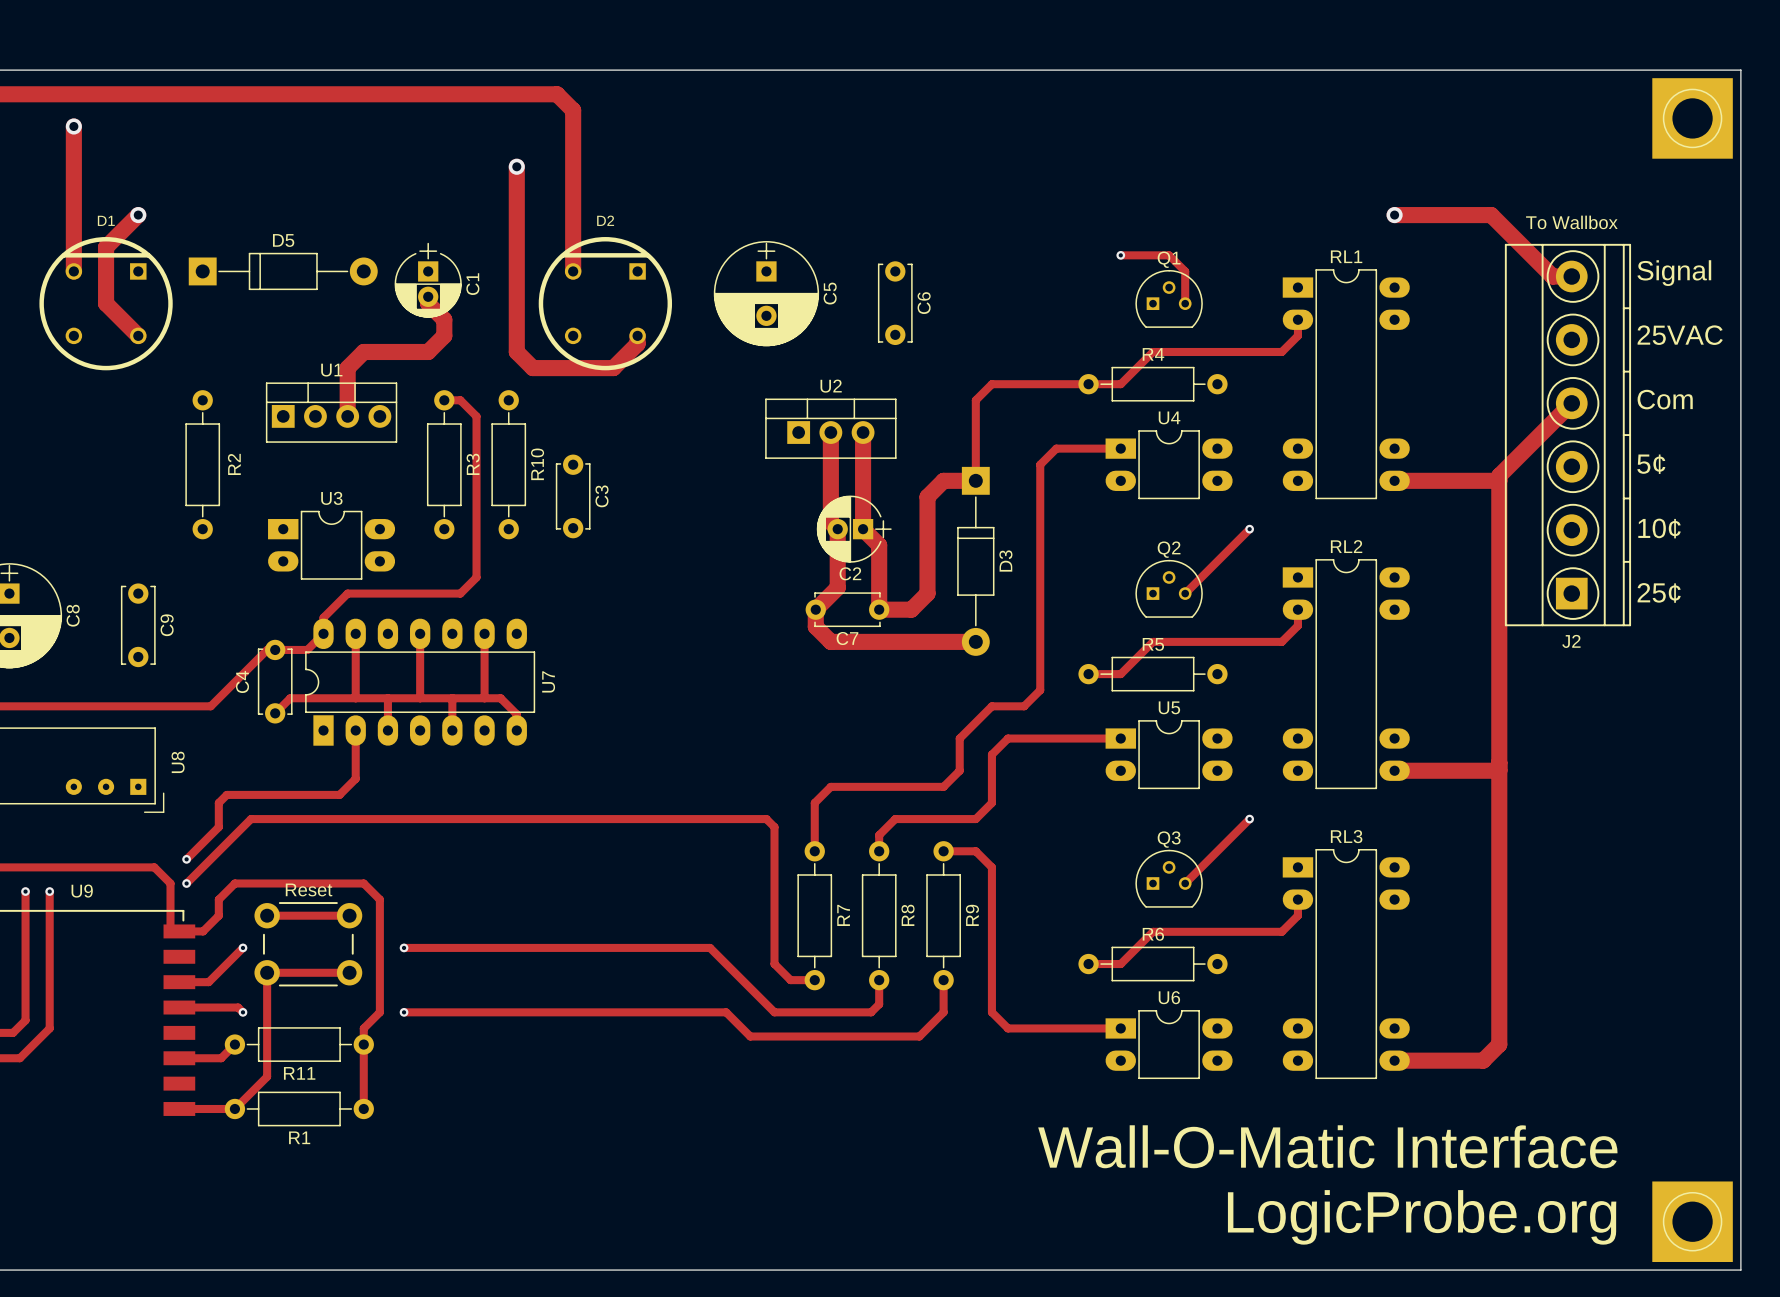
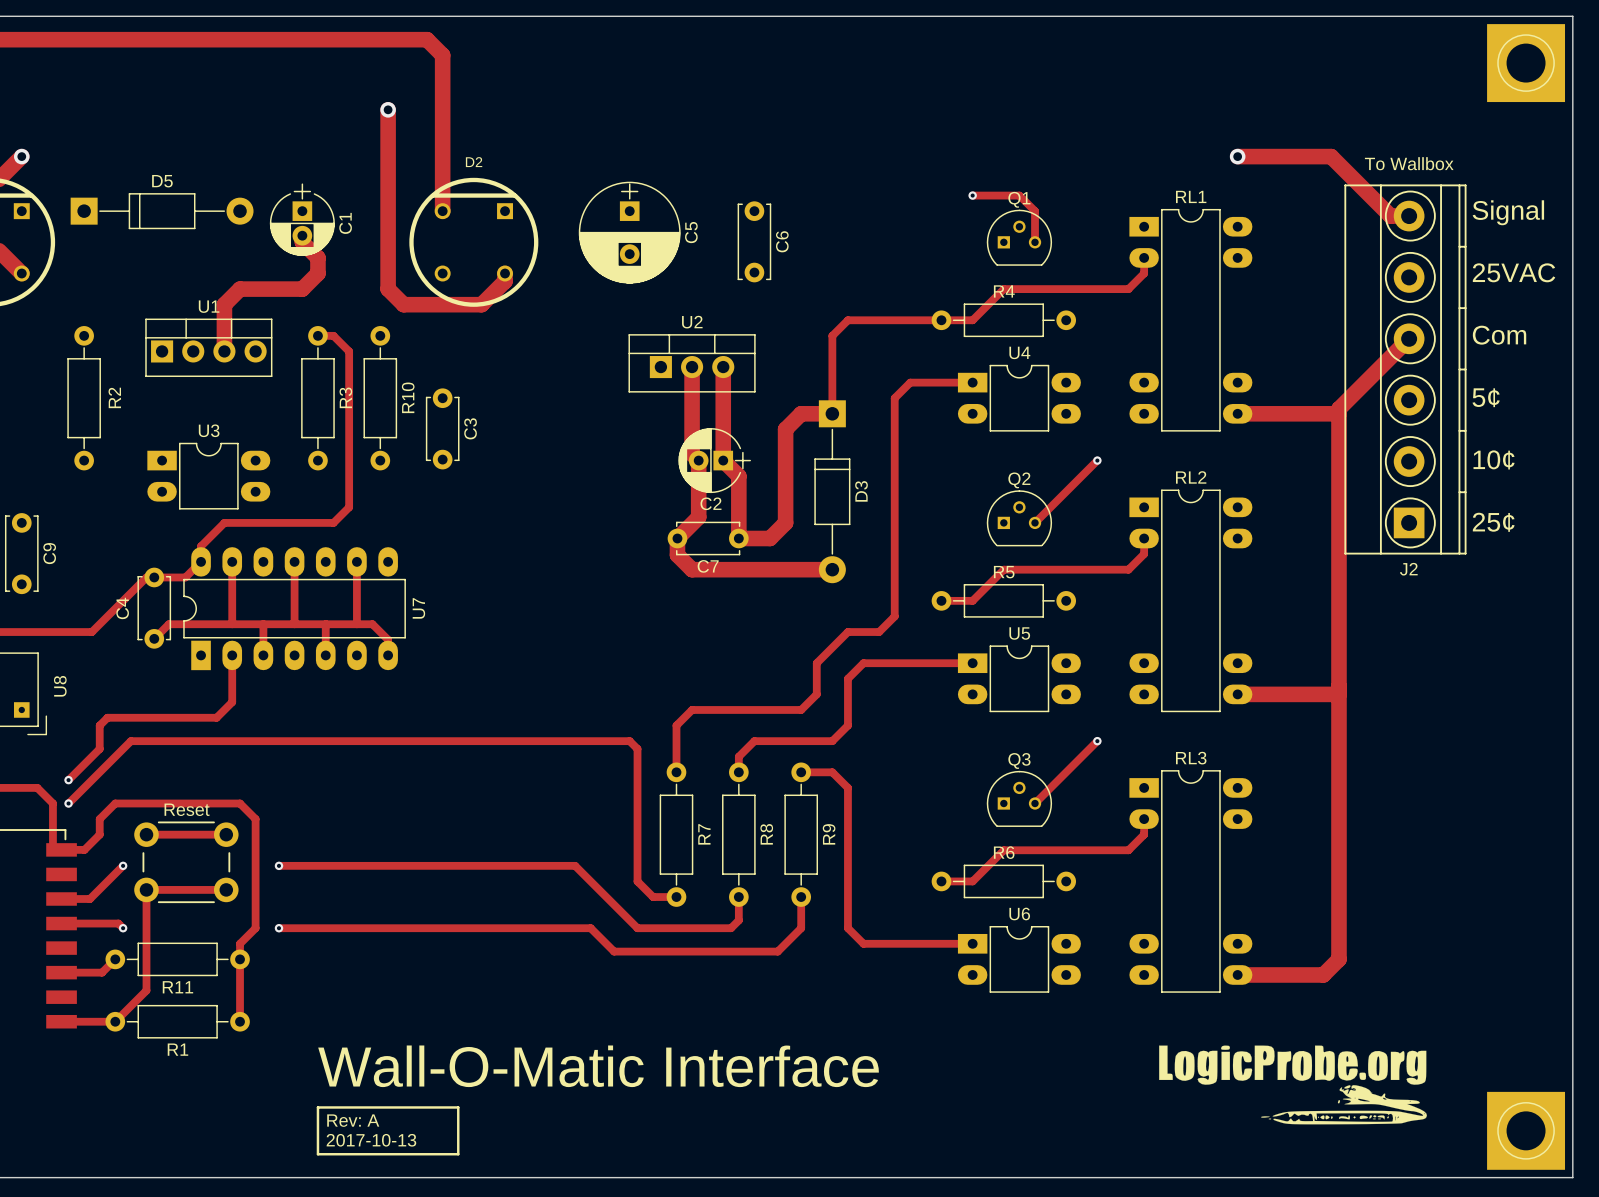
drawing: none -> [1159, 1045, 1427, 1125]
text: Wall-O-Matic Interface (1327, 1146) -> none
text: none -> Wall-O-Matic Interface (598, 1066)
line: none -> (317, 1107) (317, 1154) (458, 1154) (458, 1107) (317, 1107)
text: none -> Rev: A (353, 1120)
text: LogicProbe.org (1422, 1217) -> none
text: none -> 2017-10-13 (371, 1140)

